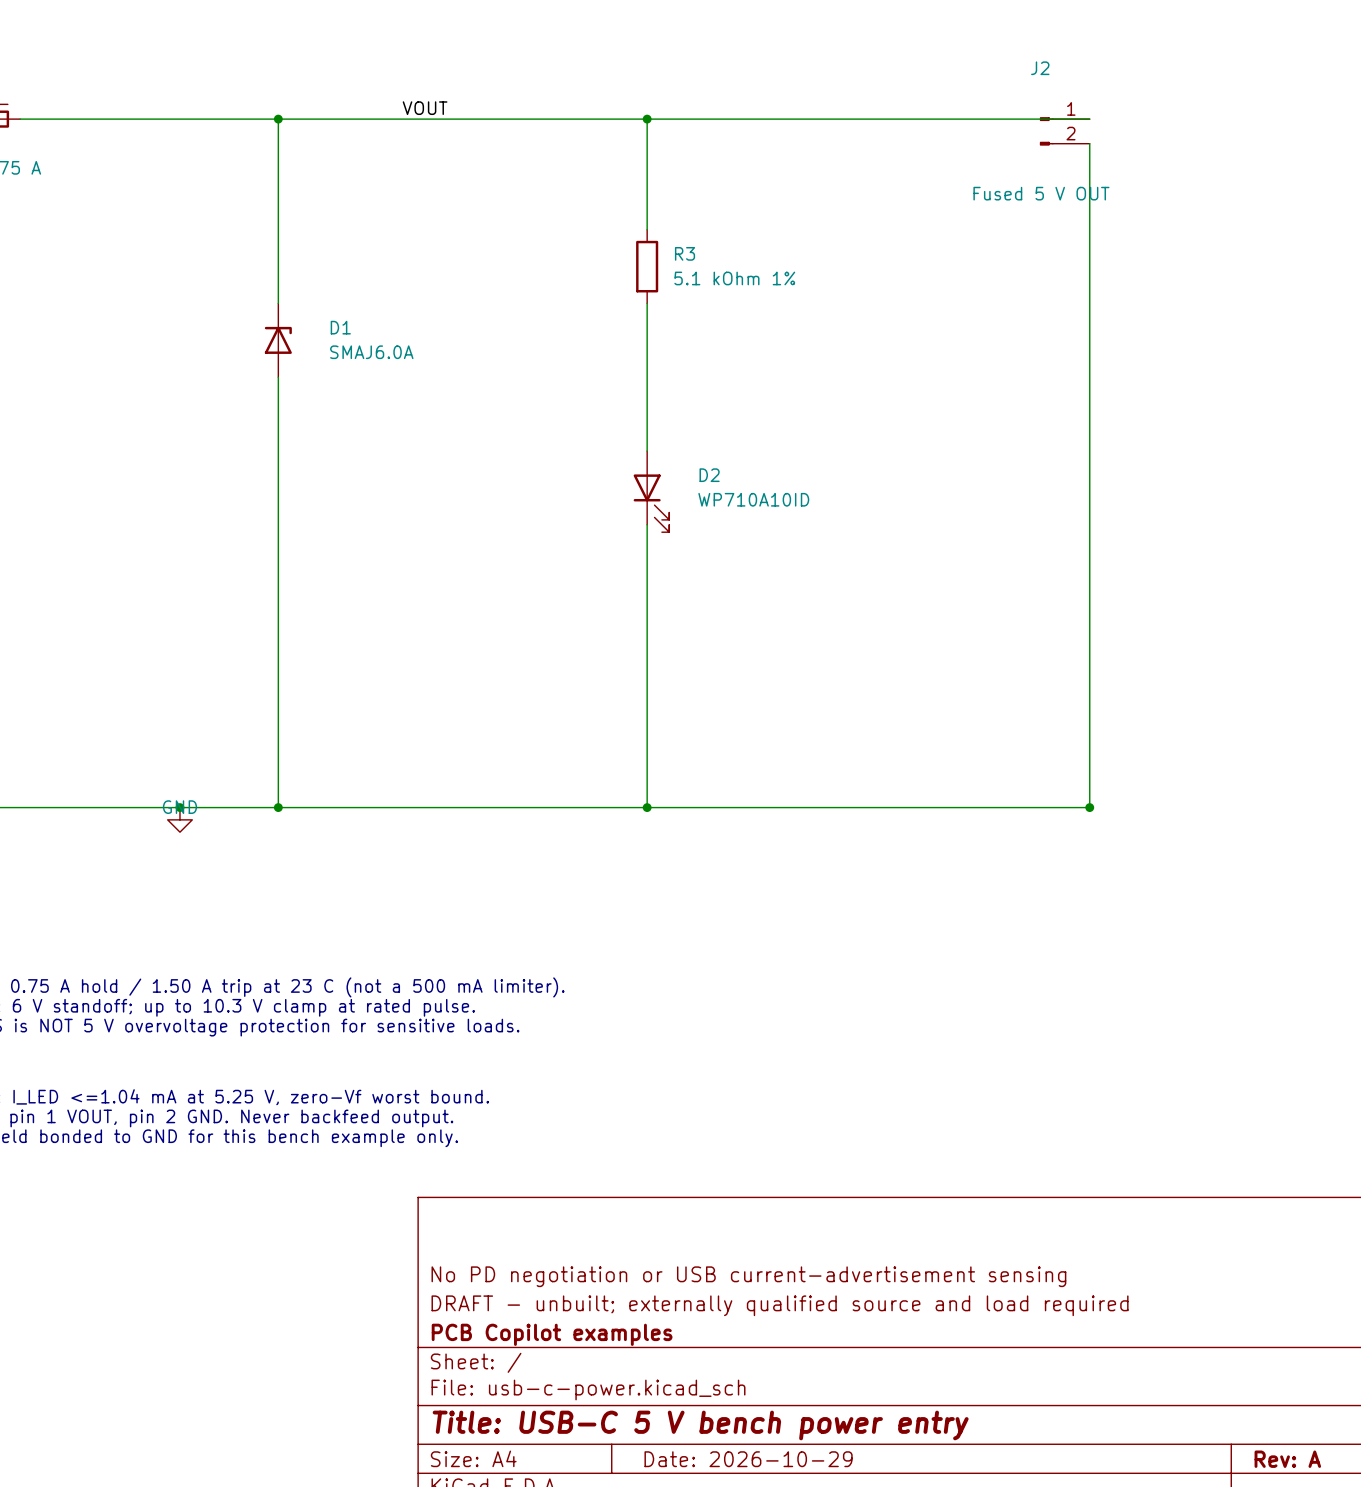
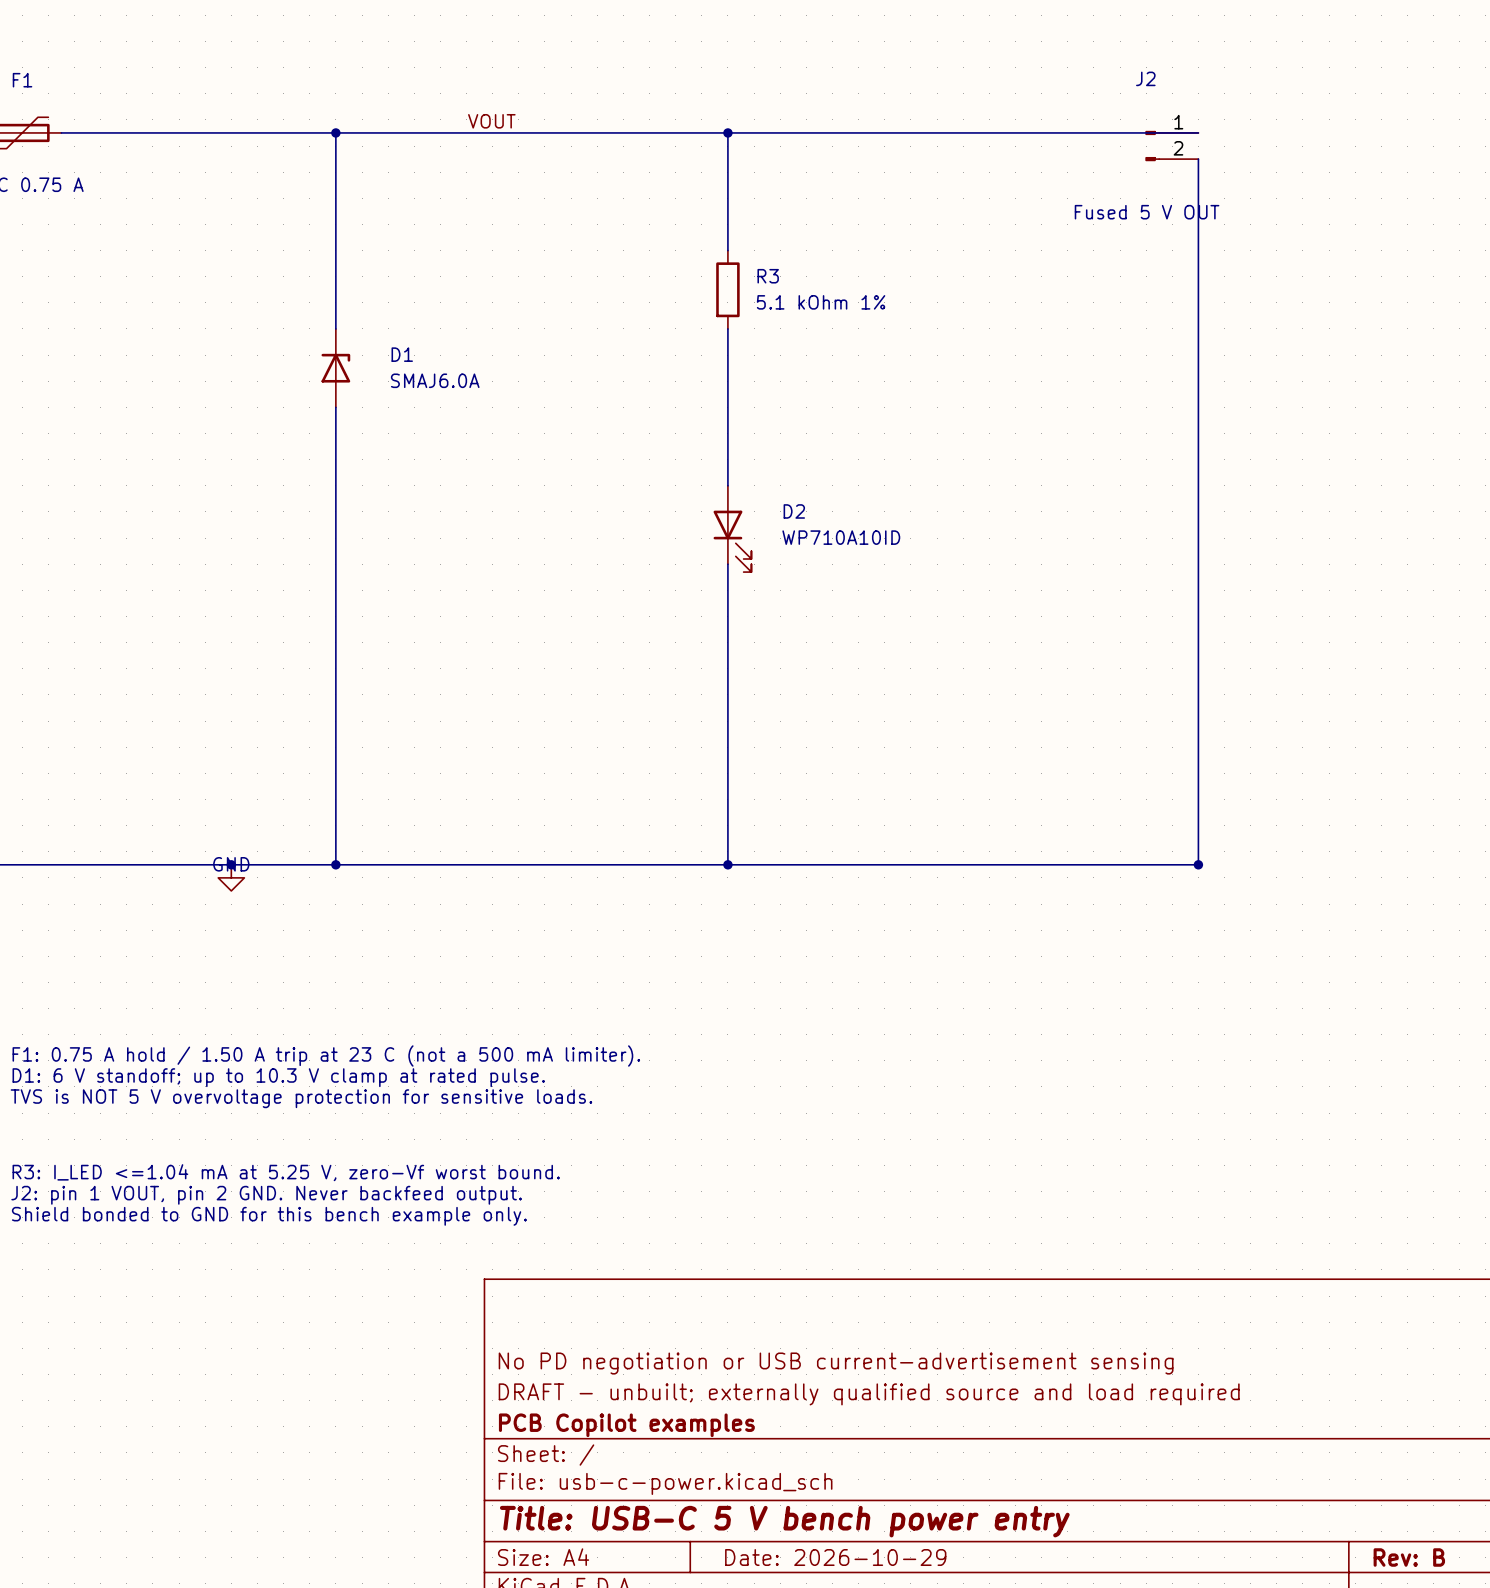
title block: Rev: A (1287, 1459) -> Rev: B (1409, 1557)

